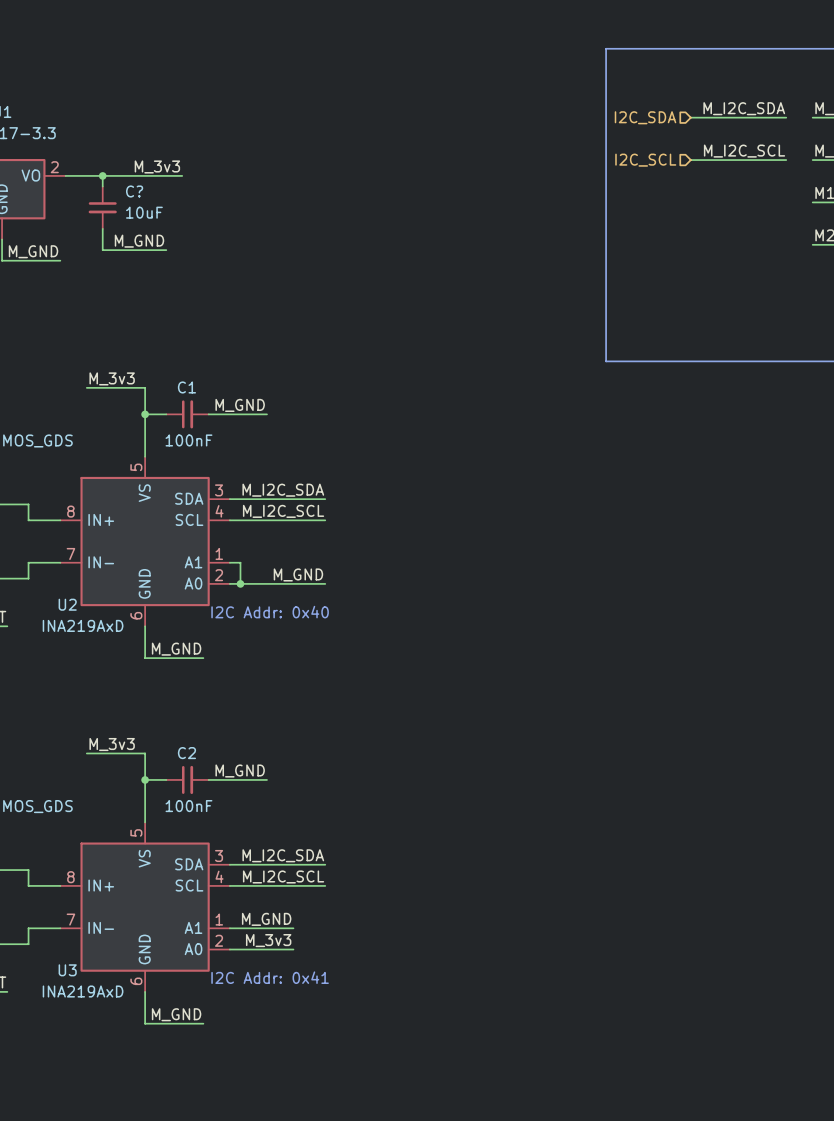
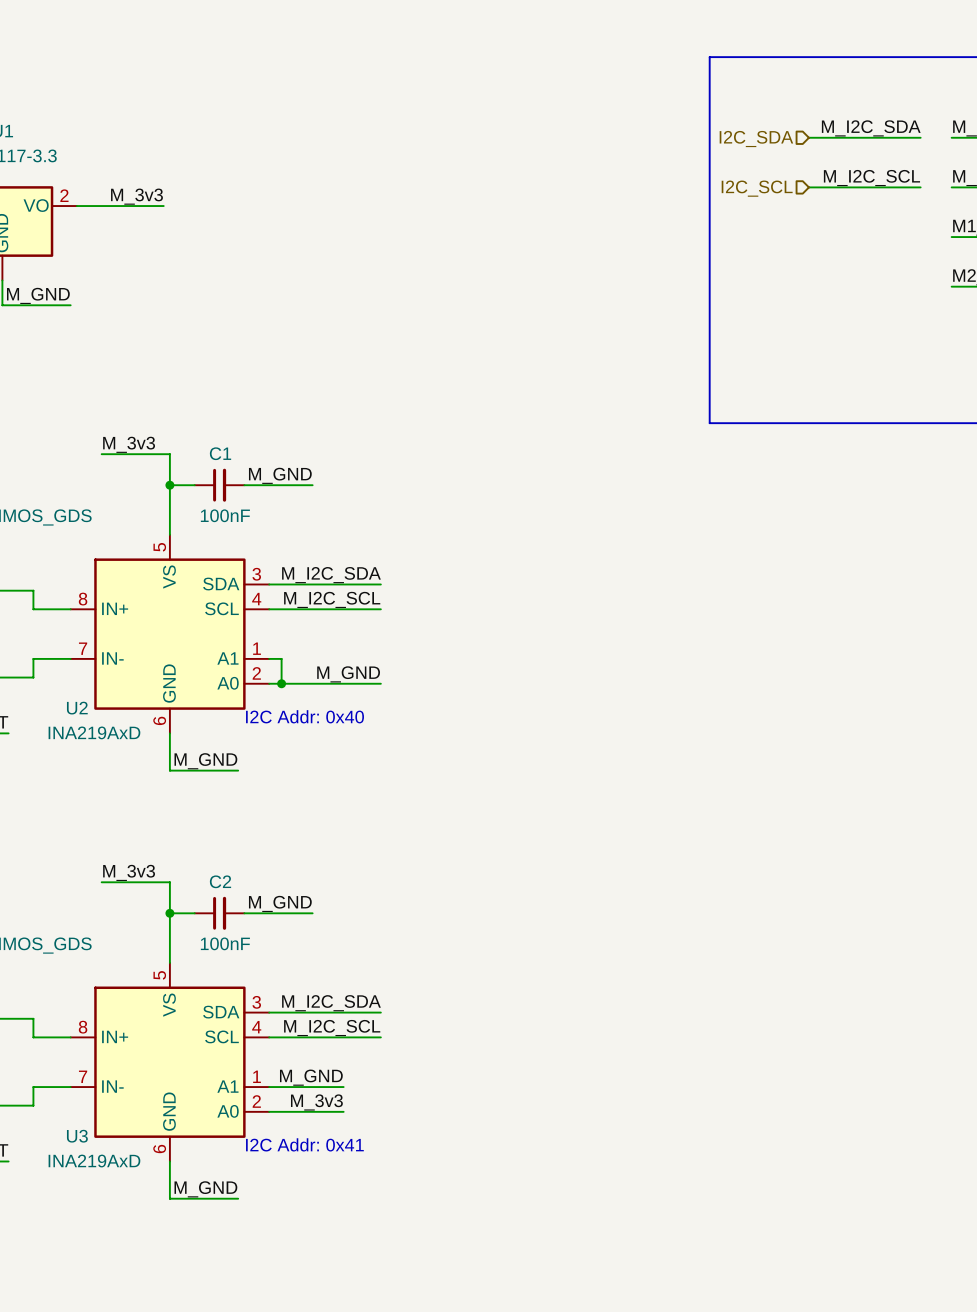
label position: M_3v3 (157, 166) -> M_3v3 (136, 196)
wire: (102, 175) (102, 186) -> none
junction: (102, 175) -> none
wire: (139, 175) (182, 175) -> none
C?: 10uF (102, 207) -> none
wire: (102, 228) (102, 250) (166, 250) -> none
label: M_GND (139, 241) -> none

